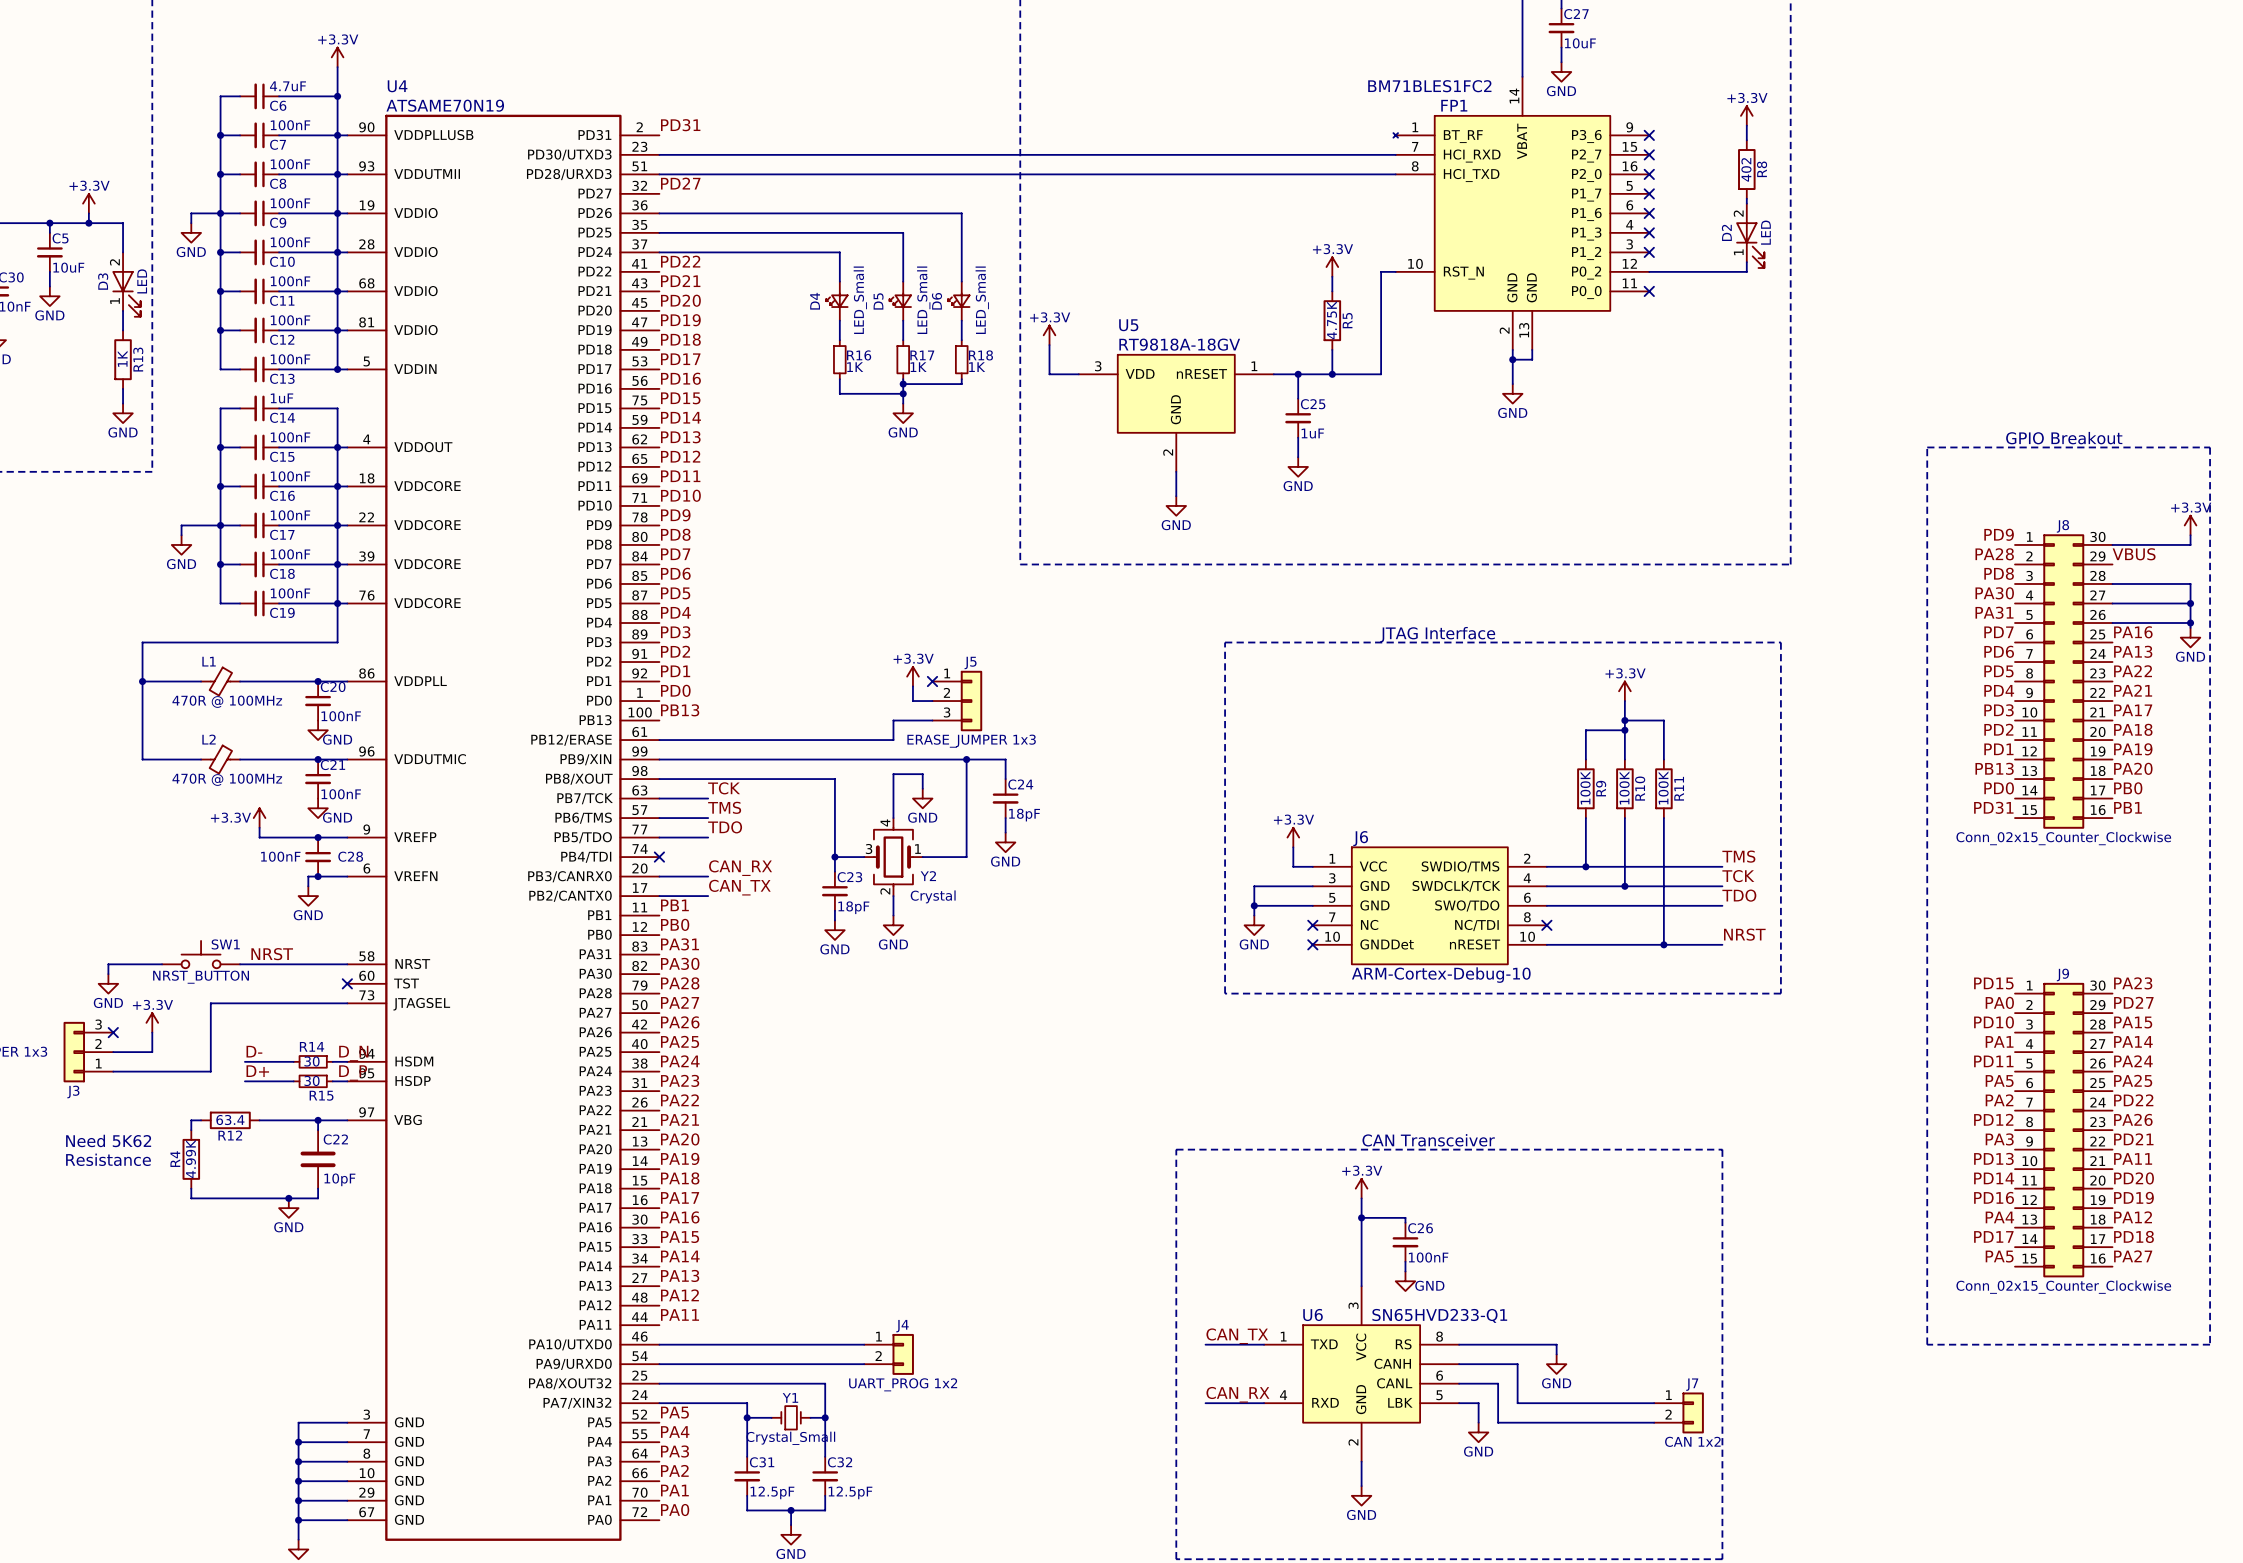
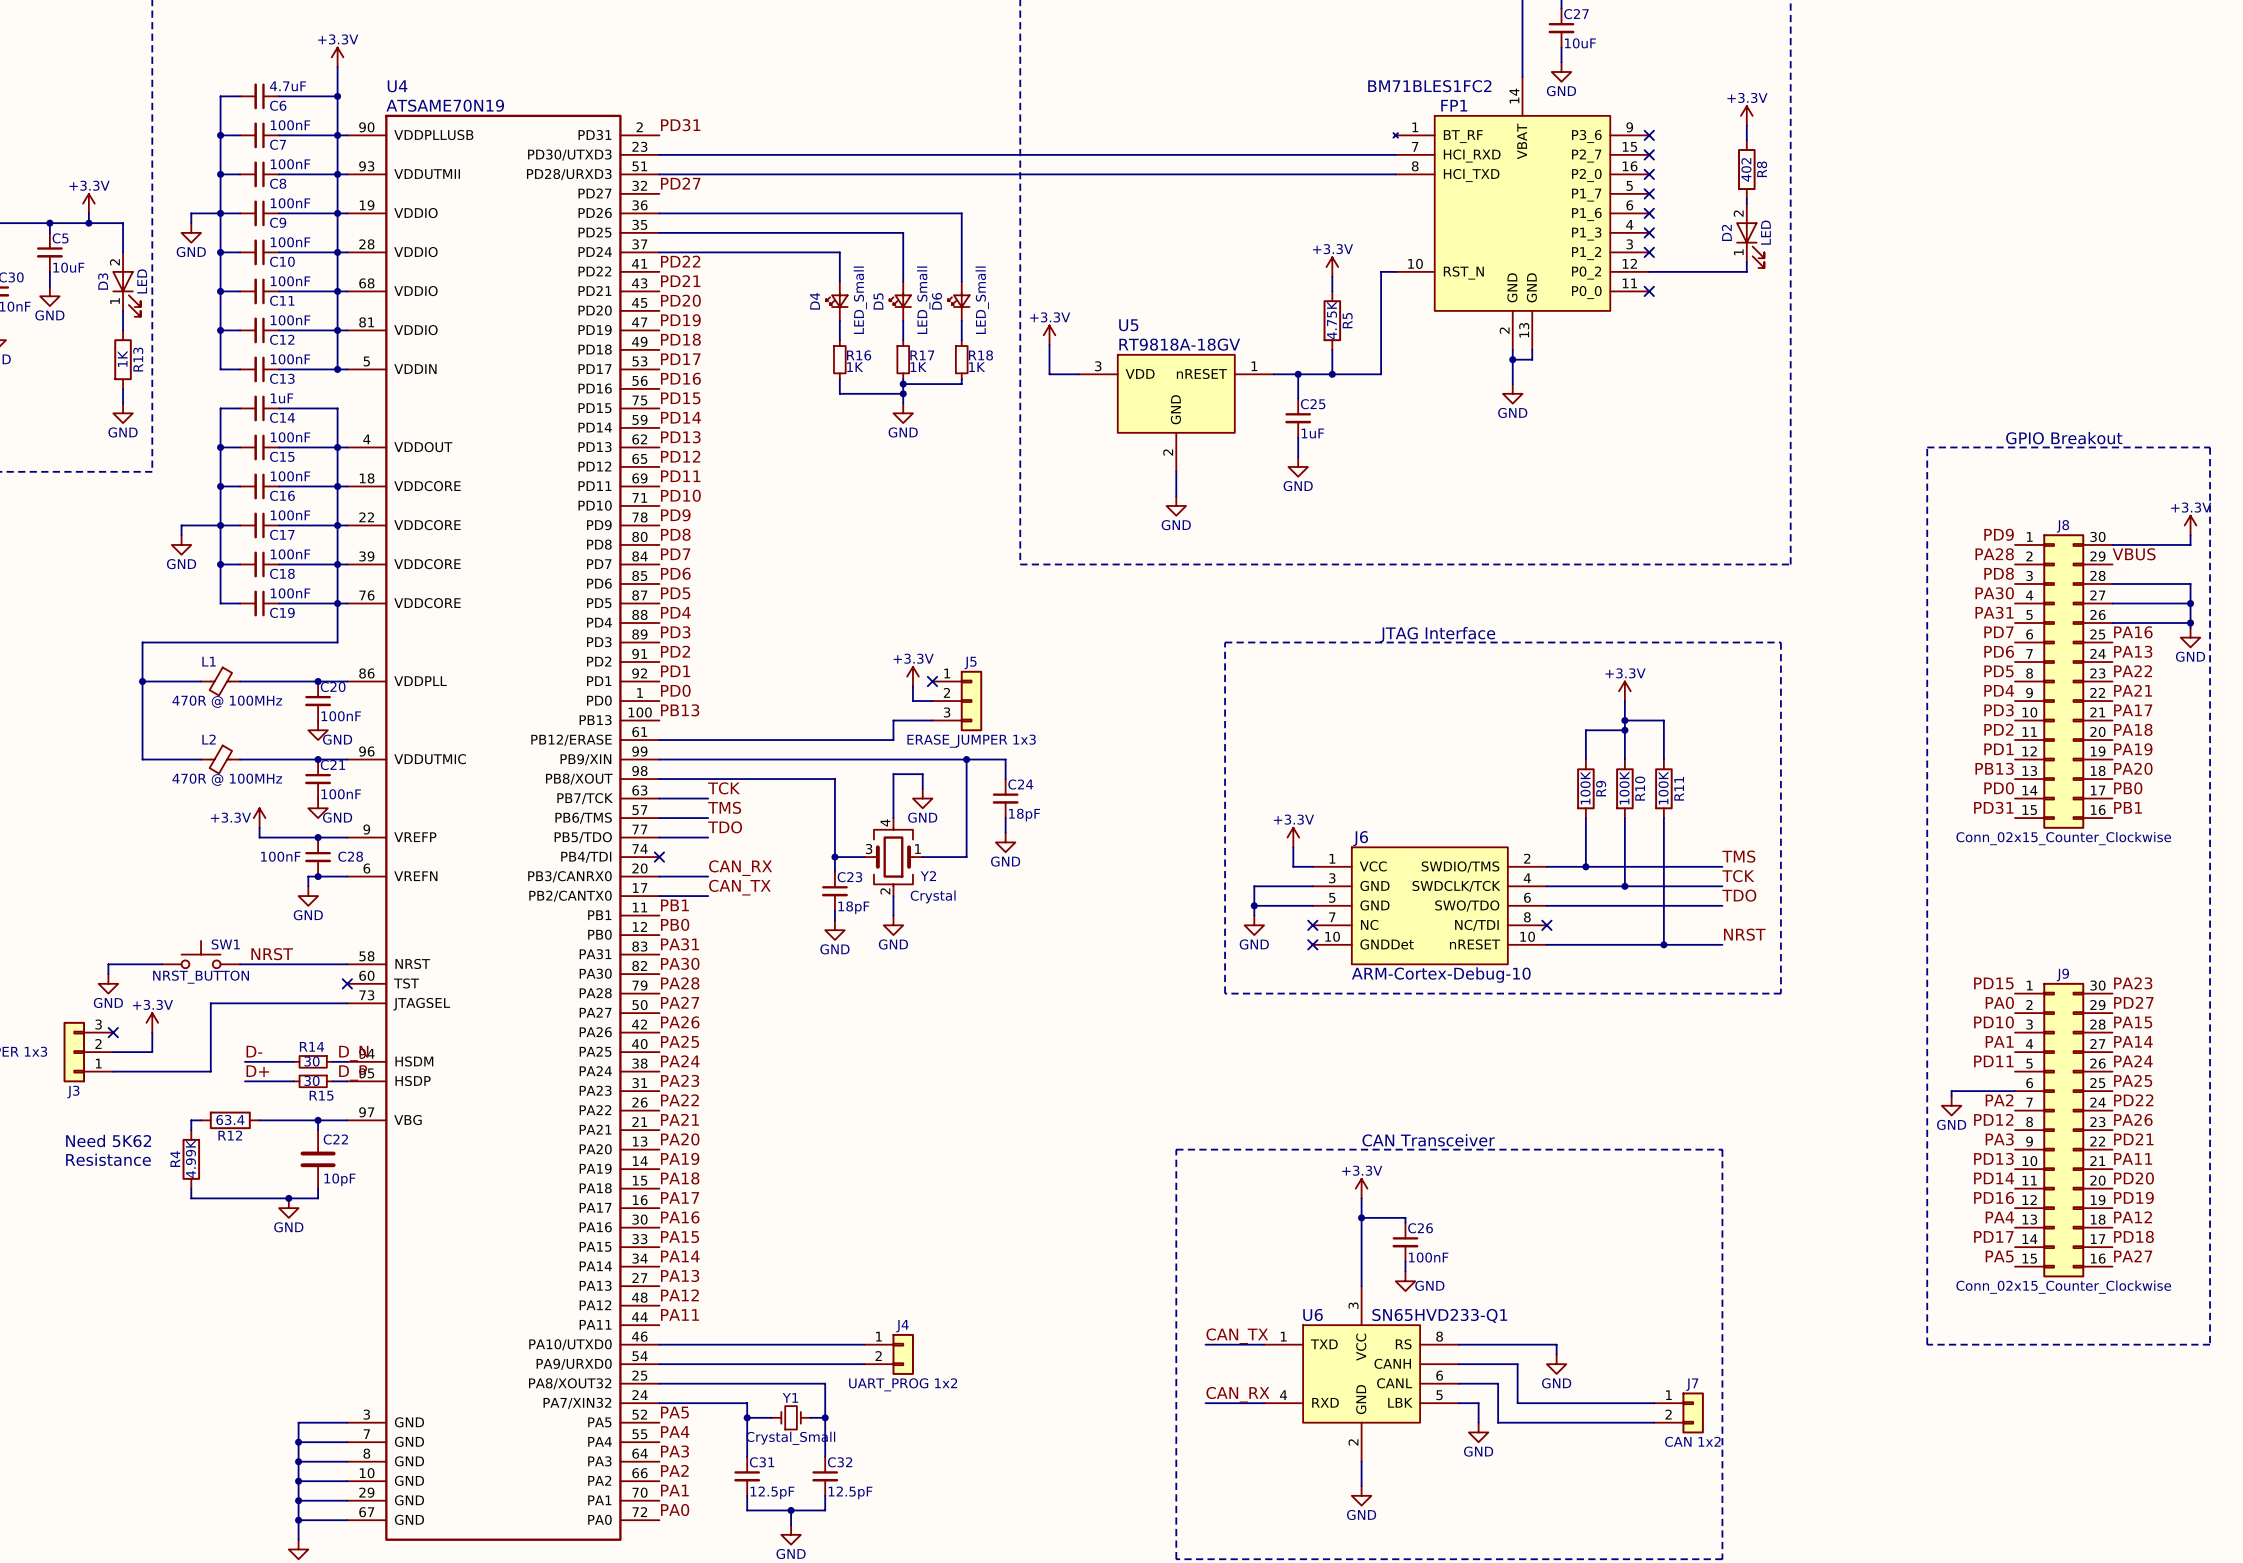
label: PA5 (1999, 1081) -> none
wire: none -> (2014, 1091) (1951, 1091) (1951, 1095)
power symbol: none -> GND (1951, 1105)

